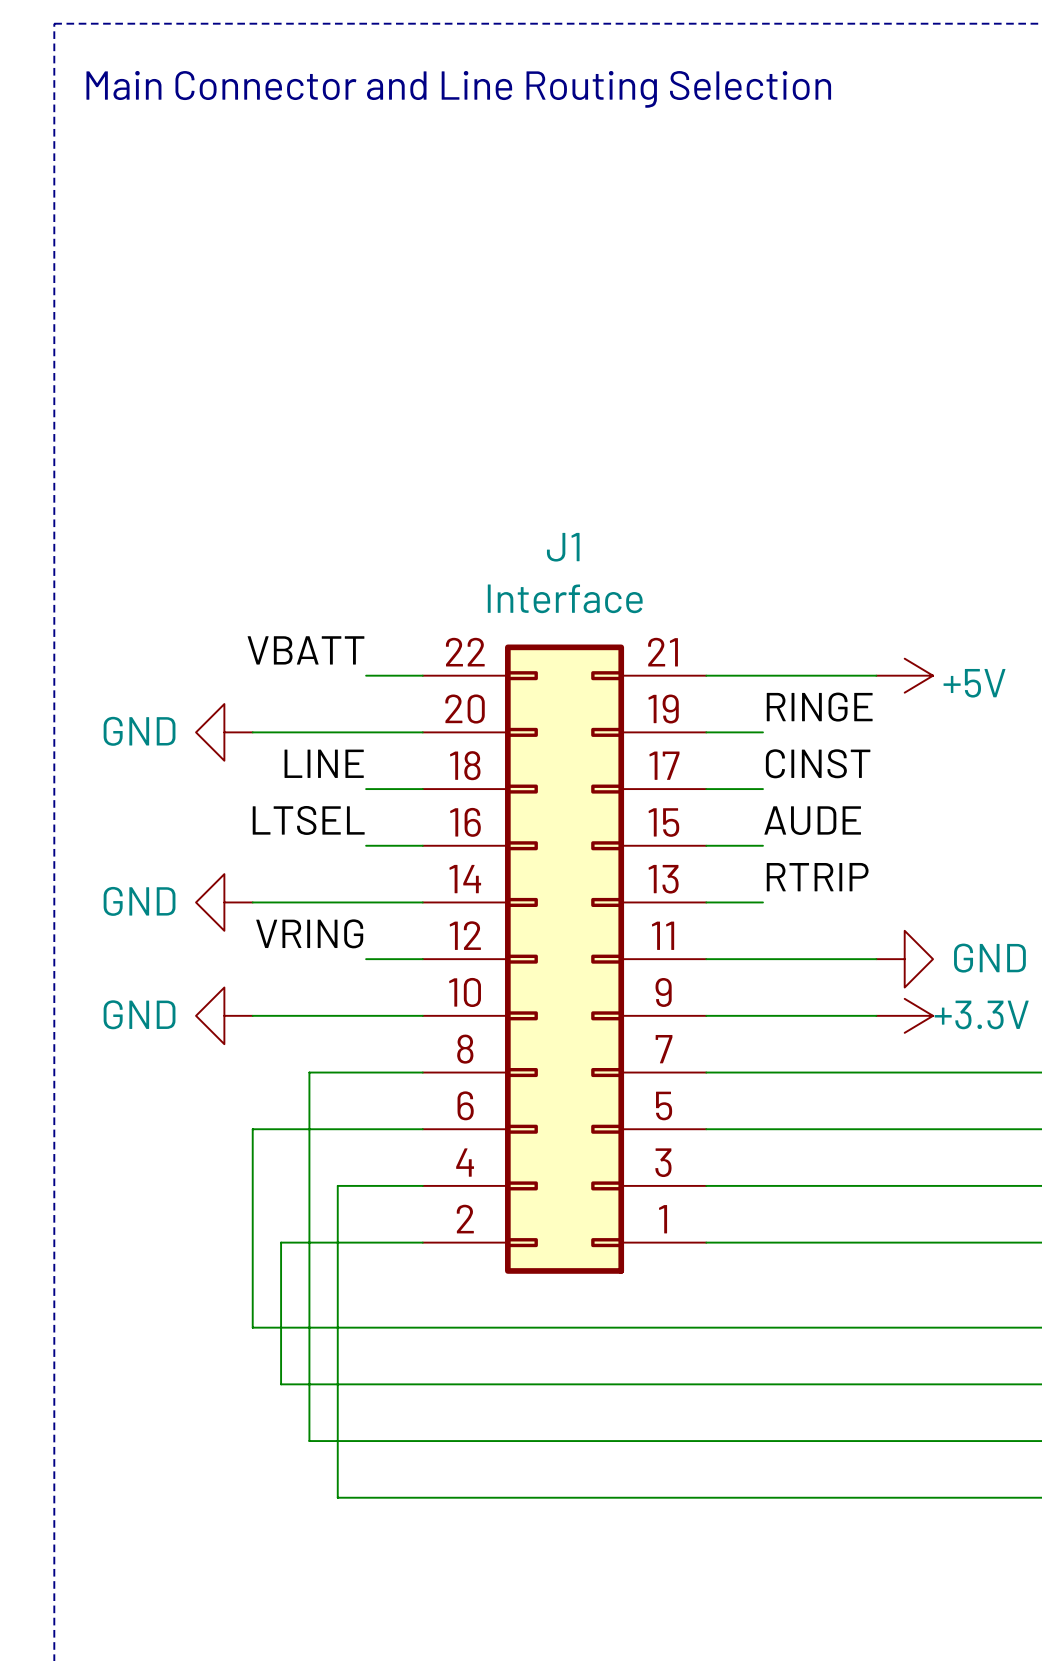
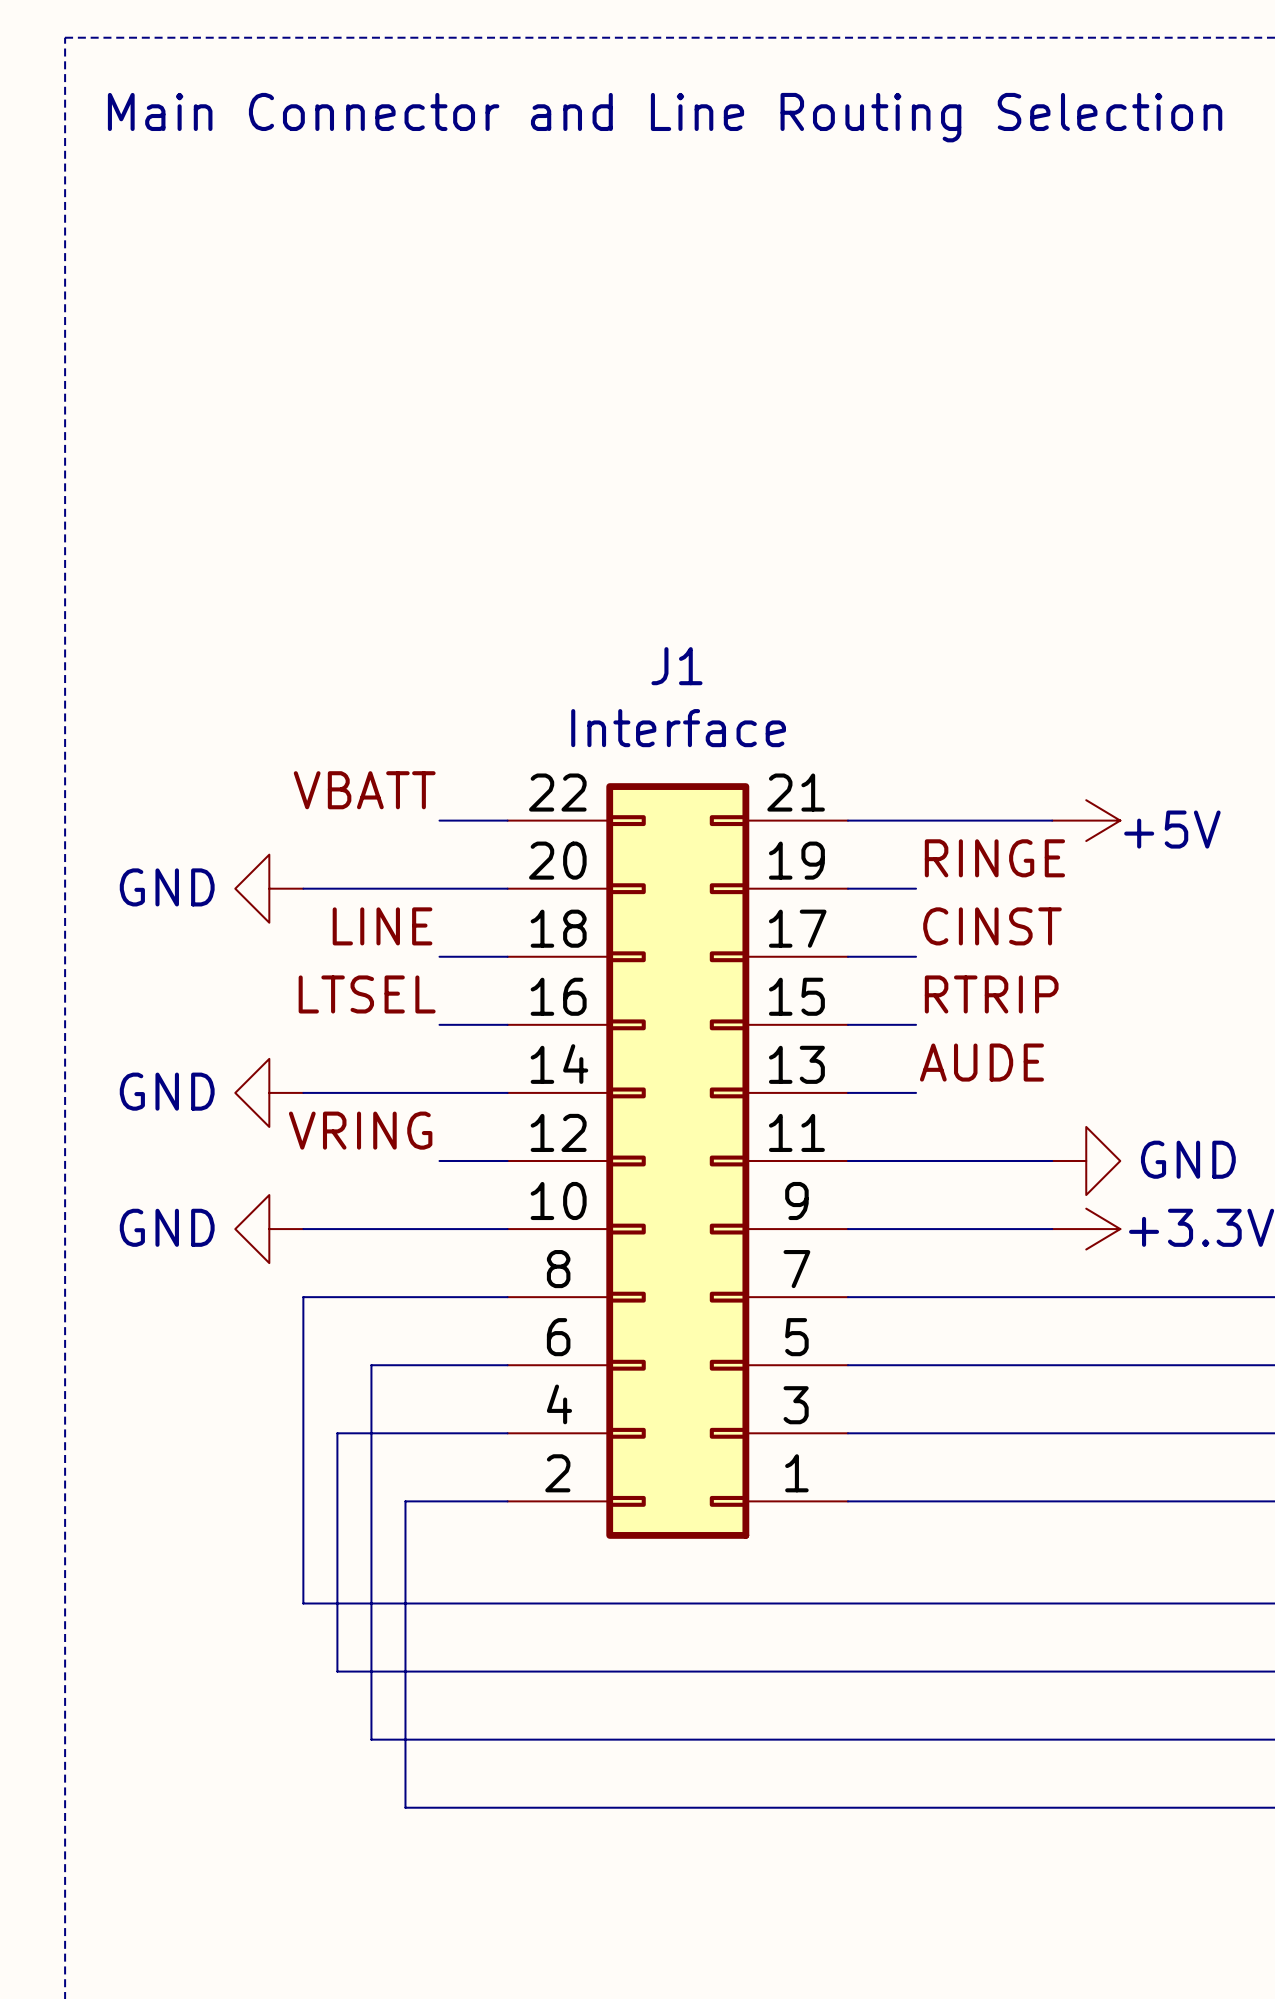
label: AUDE (812, 820) -> RTRIP (991, 994)
label: RTRIP (817, 877) -> AUDE (981, 1062)
wire: (309, 1072) (309, 1129) (252, 1129) -> (371, 1297) (303, 1297) (303, 1365)
wire: (337, 1185) (337, 1242) (281, 1242) -> (405, 1433) (337, 1433) (337, 1501)

